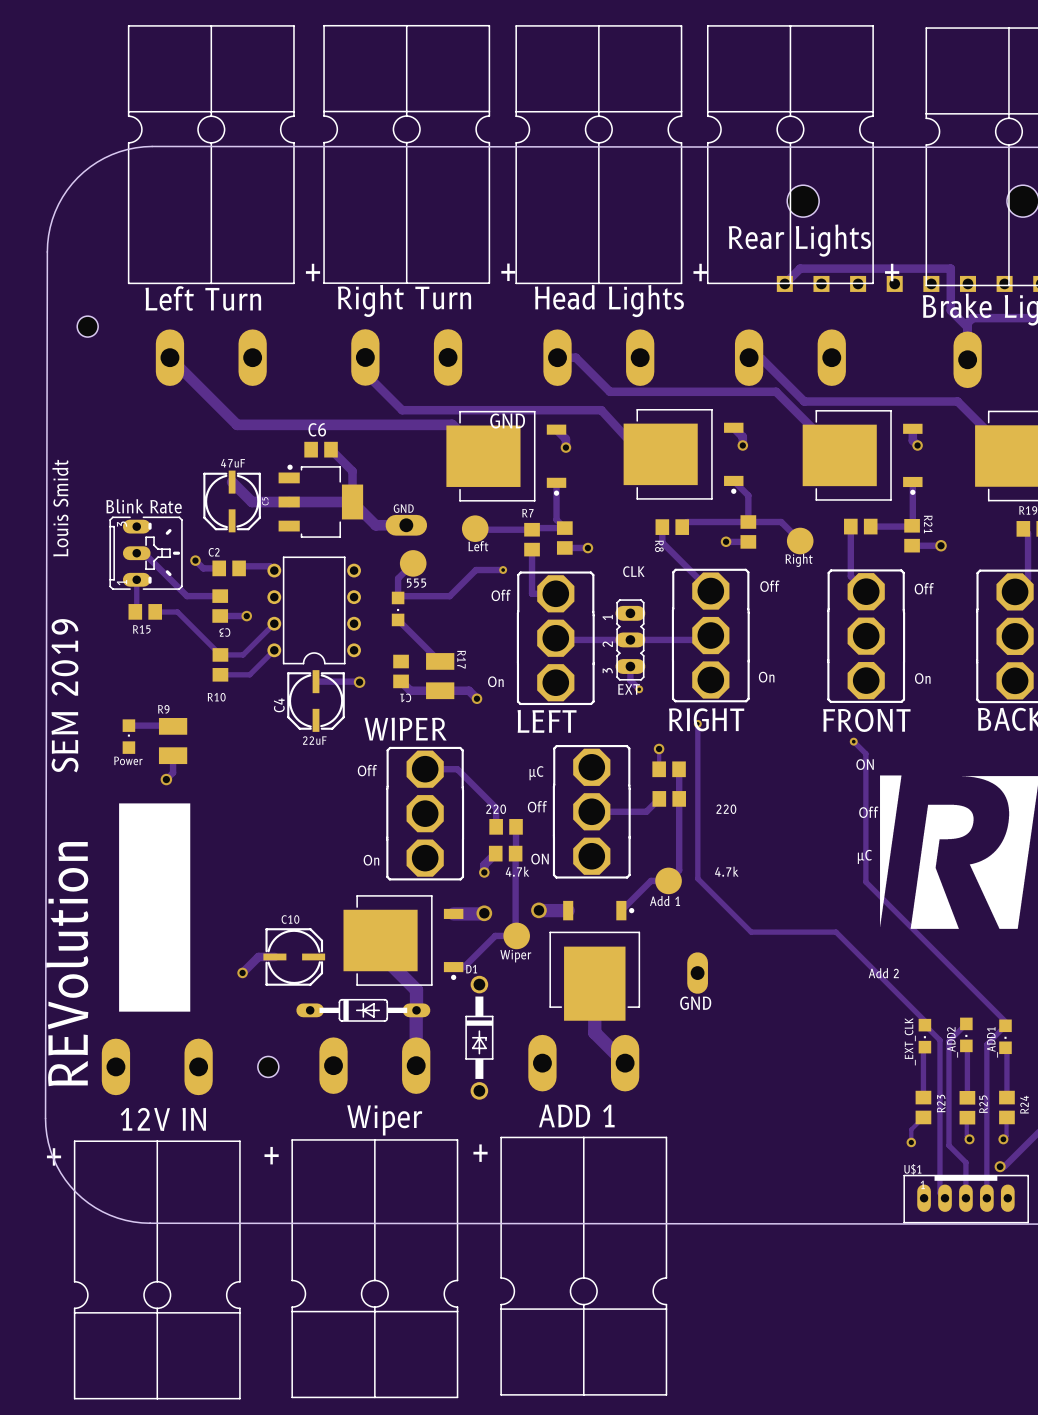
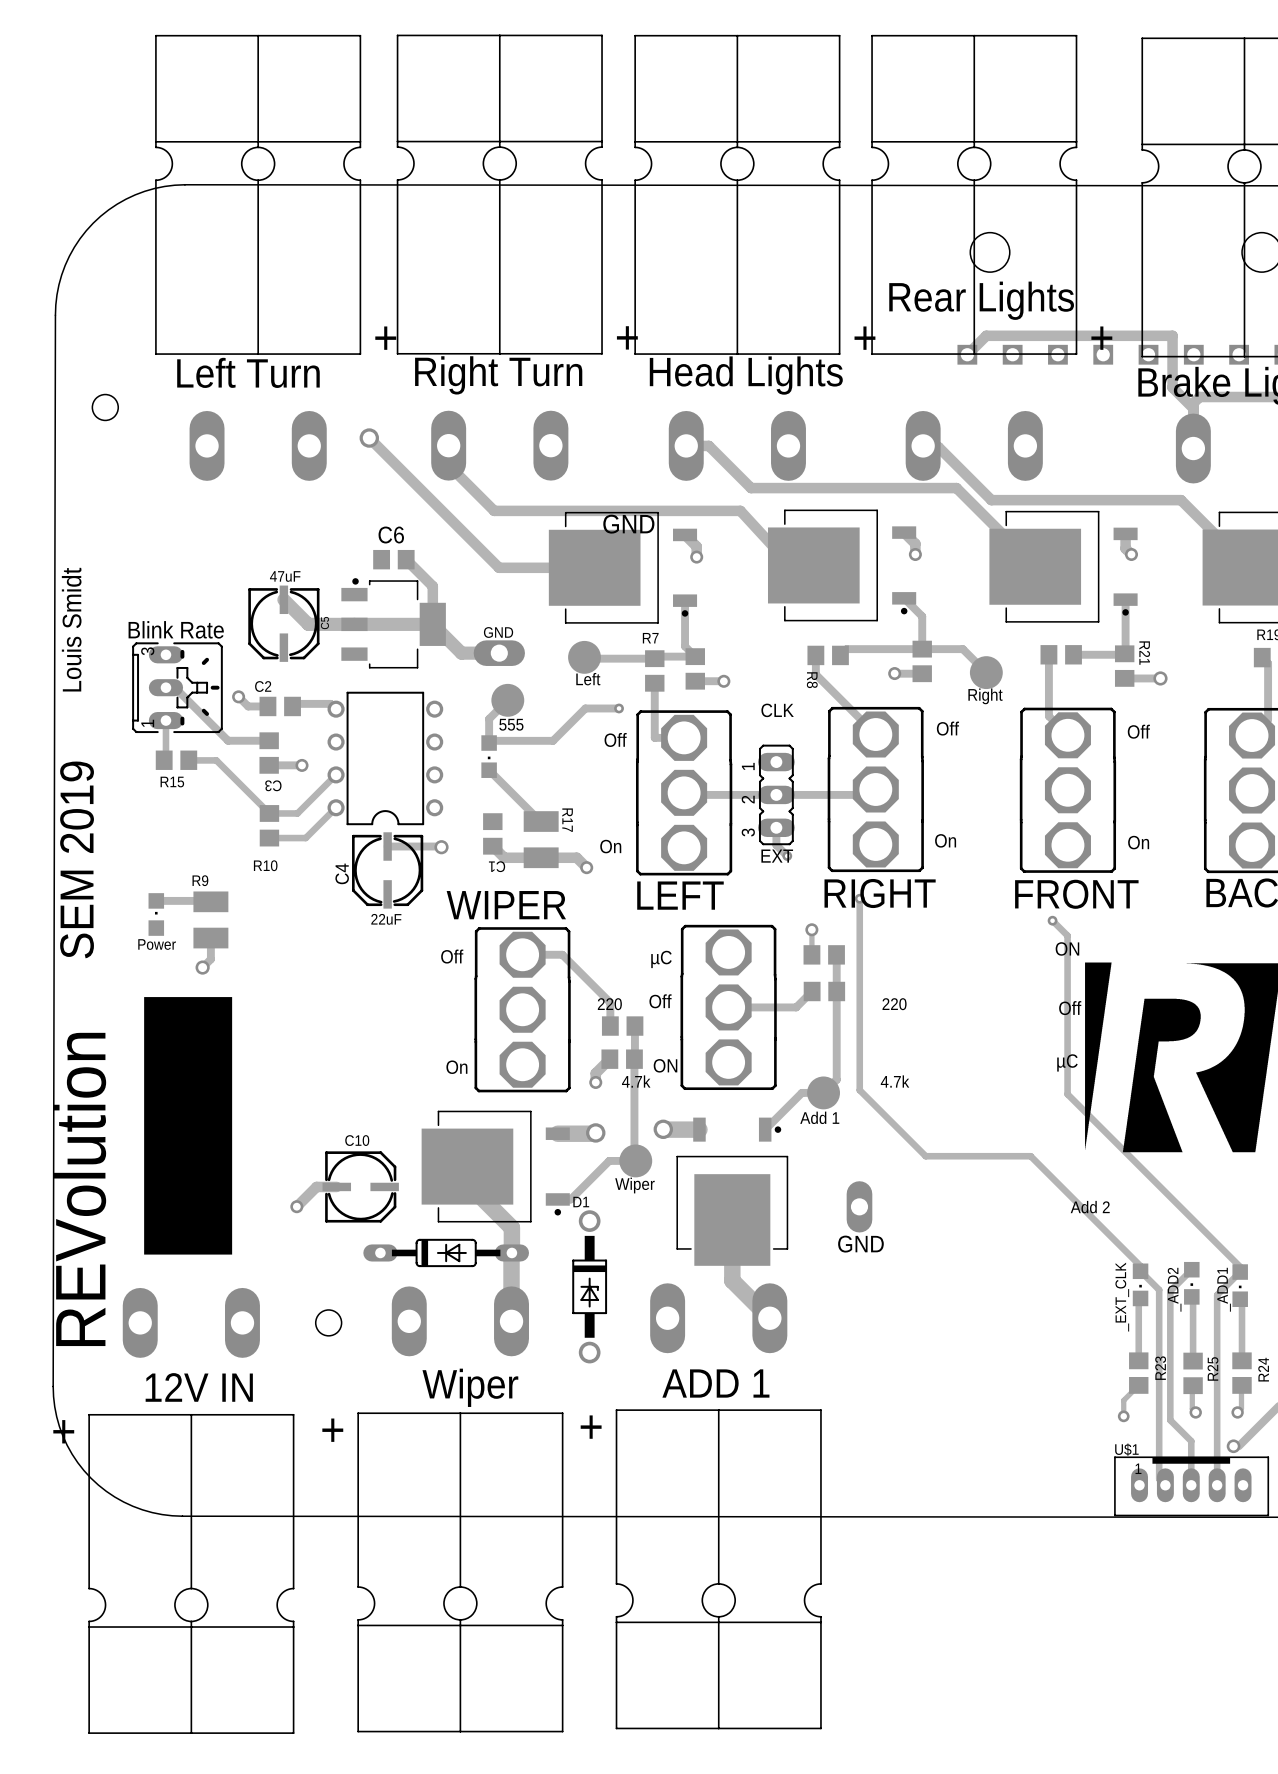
via: none -> (369, 438)
track: (169, 357) (237, 424) (452, 424) (483, 456) -> (369, 438) (499, 567) (594, 567)

